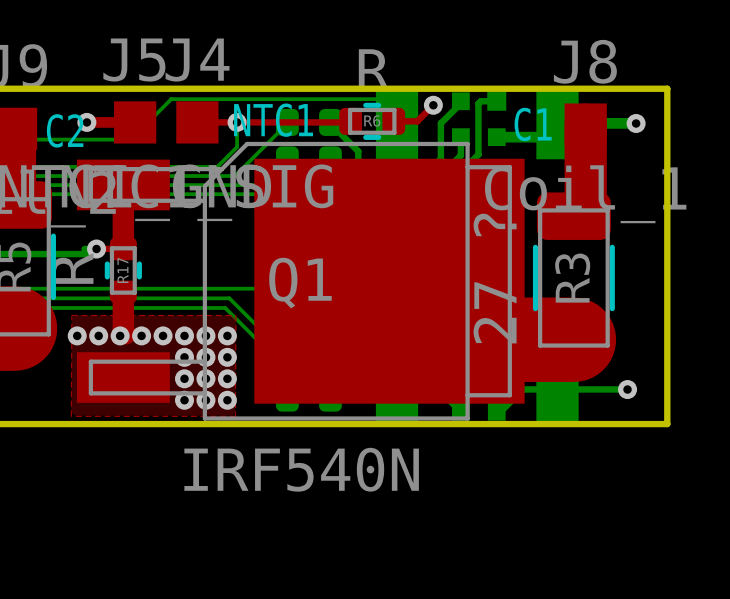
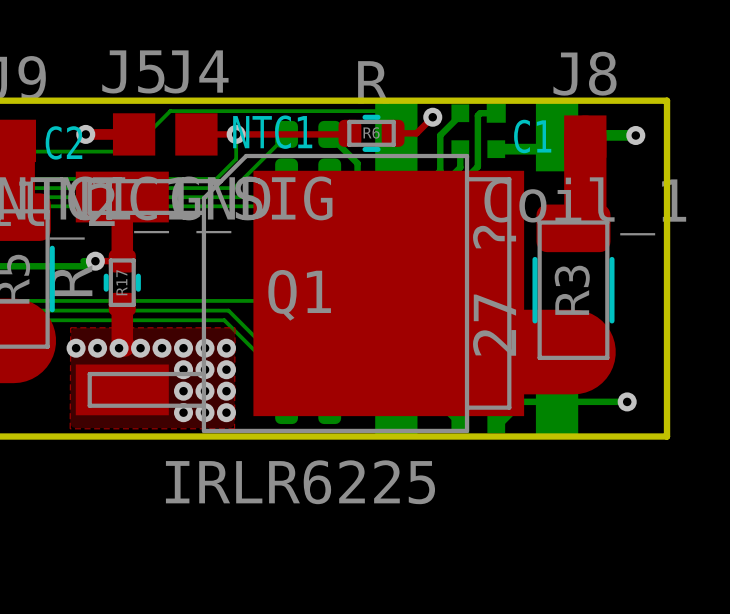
Q1 value: IRF540N (301, 469) -> IRLR6225 (300, 482)

